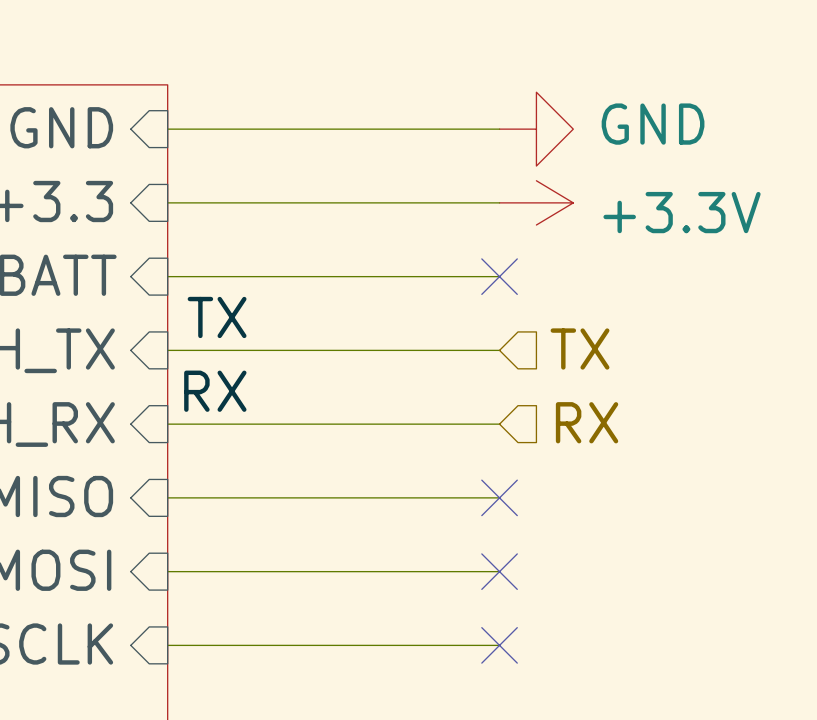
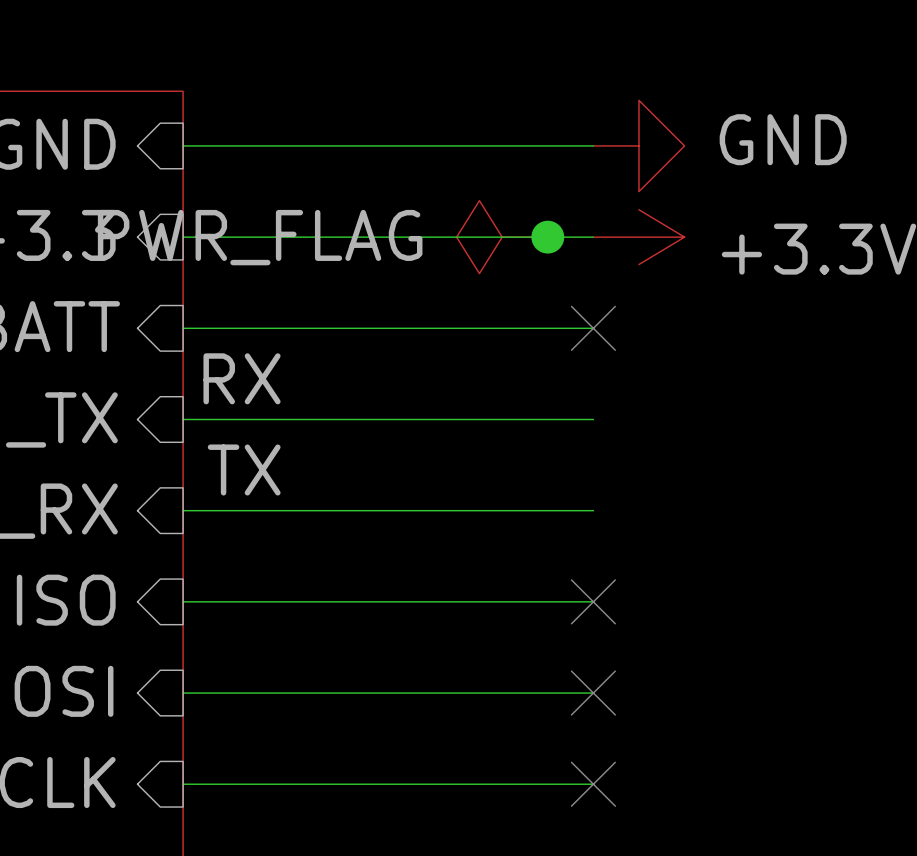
power symbol: none -> PWR_FLAG (502, 237)
junction: none -> (547, 237)
label: TX (217, 317) -> RX (242, 378)
hierarchical label: TX (580, 349) -> none
label: RX (215, 391) -> TX (244, 470)
hierarchical label: RX (587, 422) -> none

